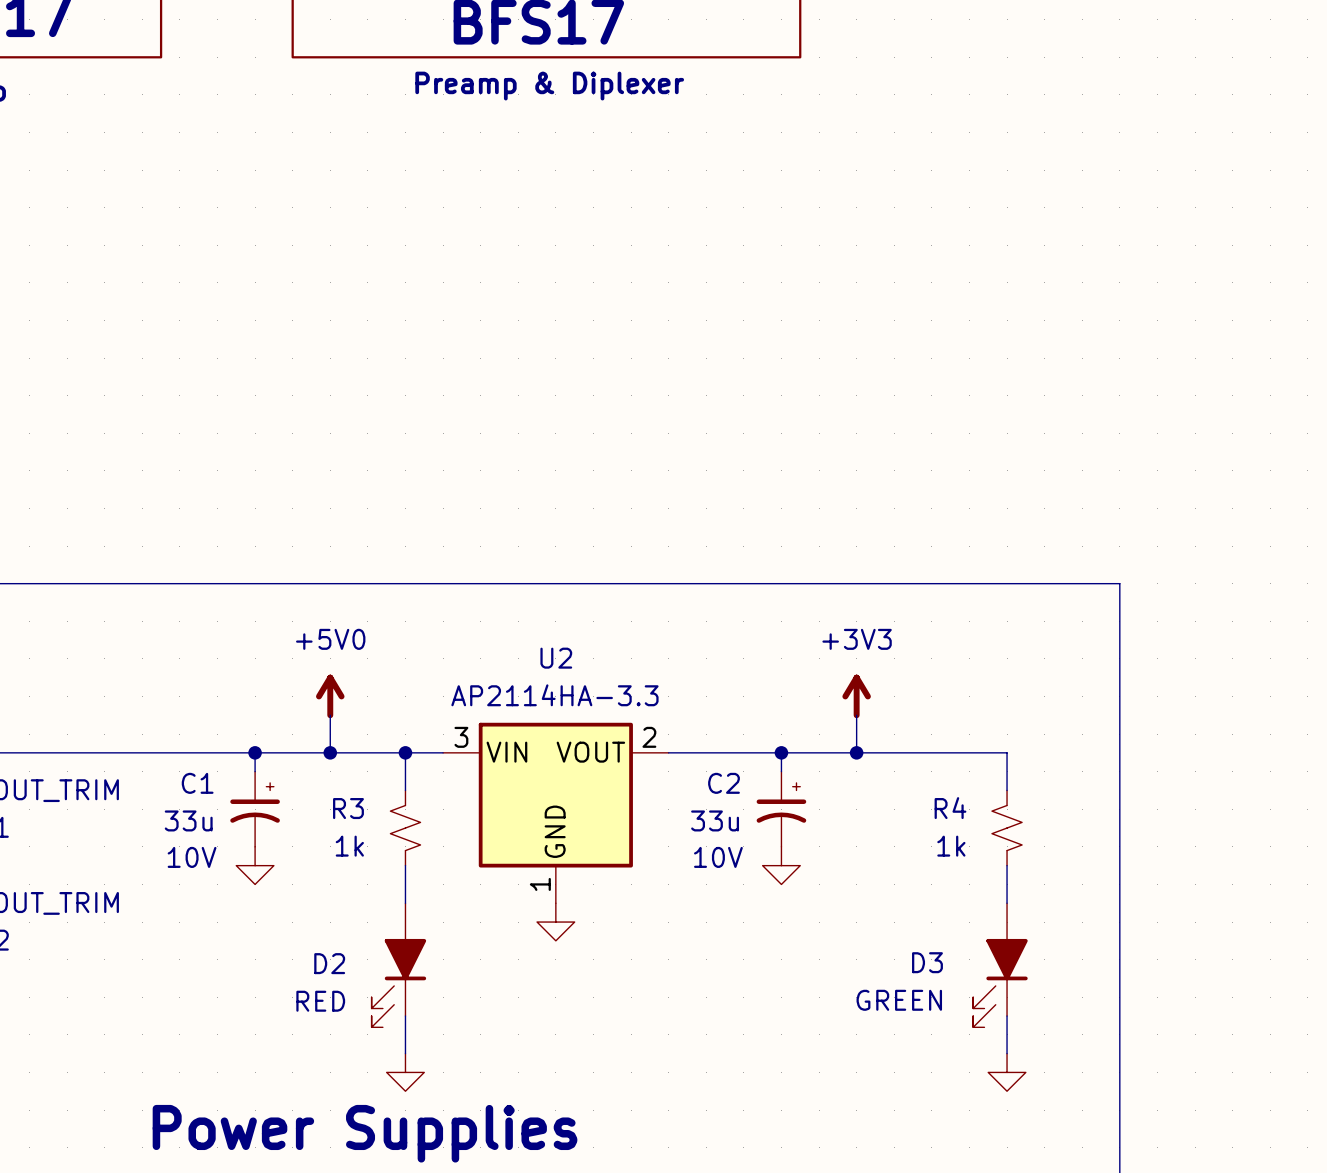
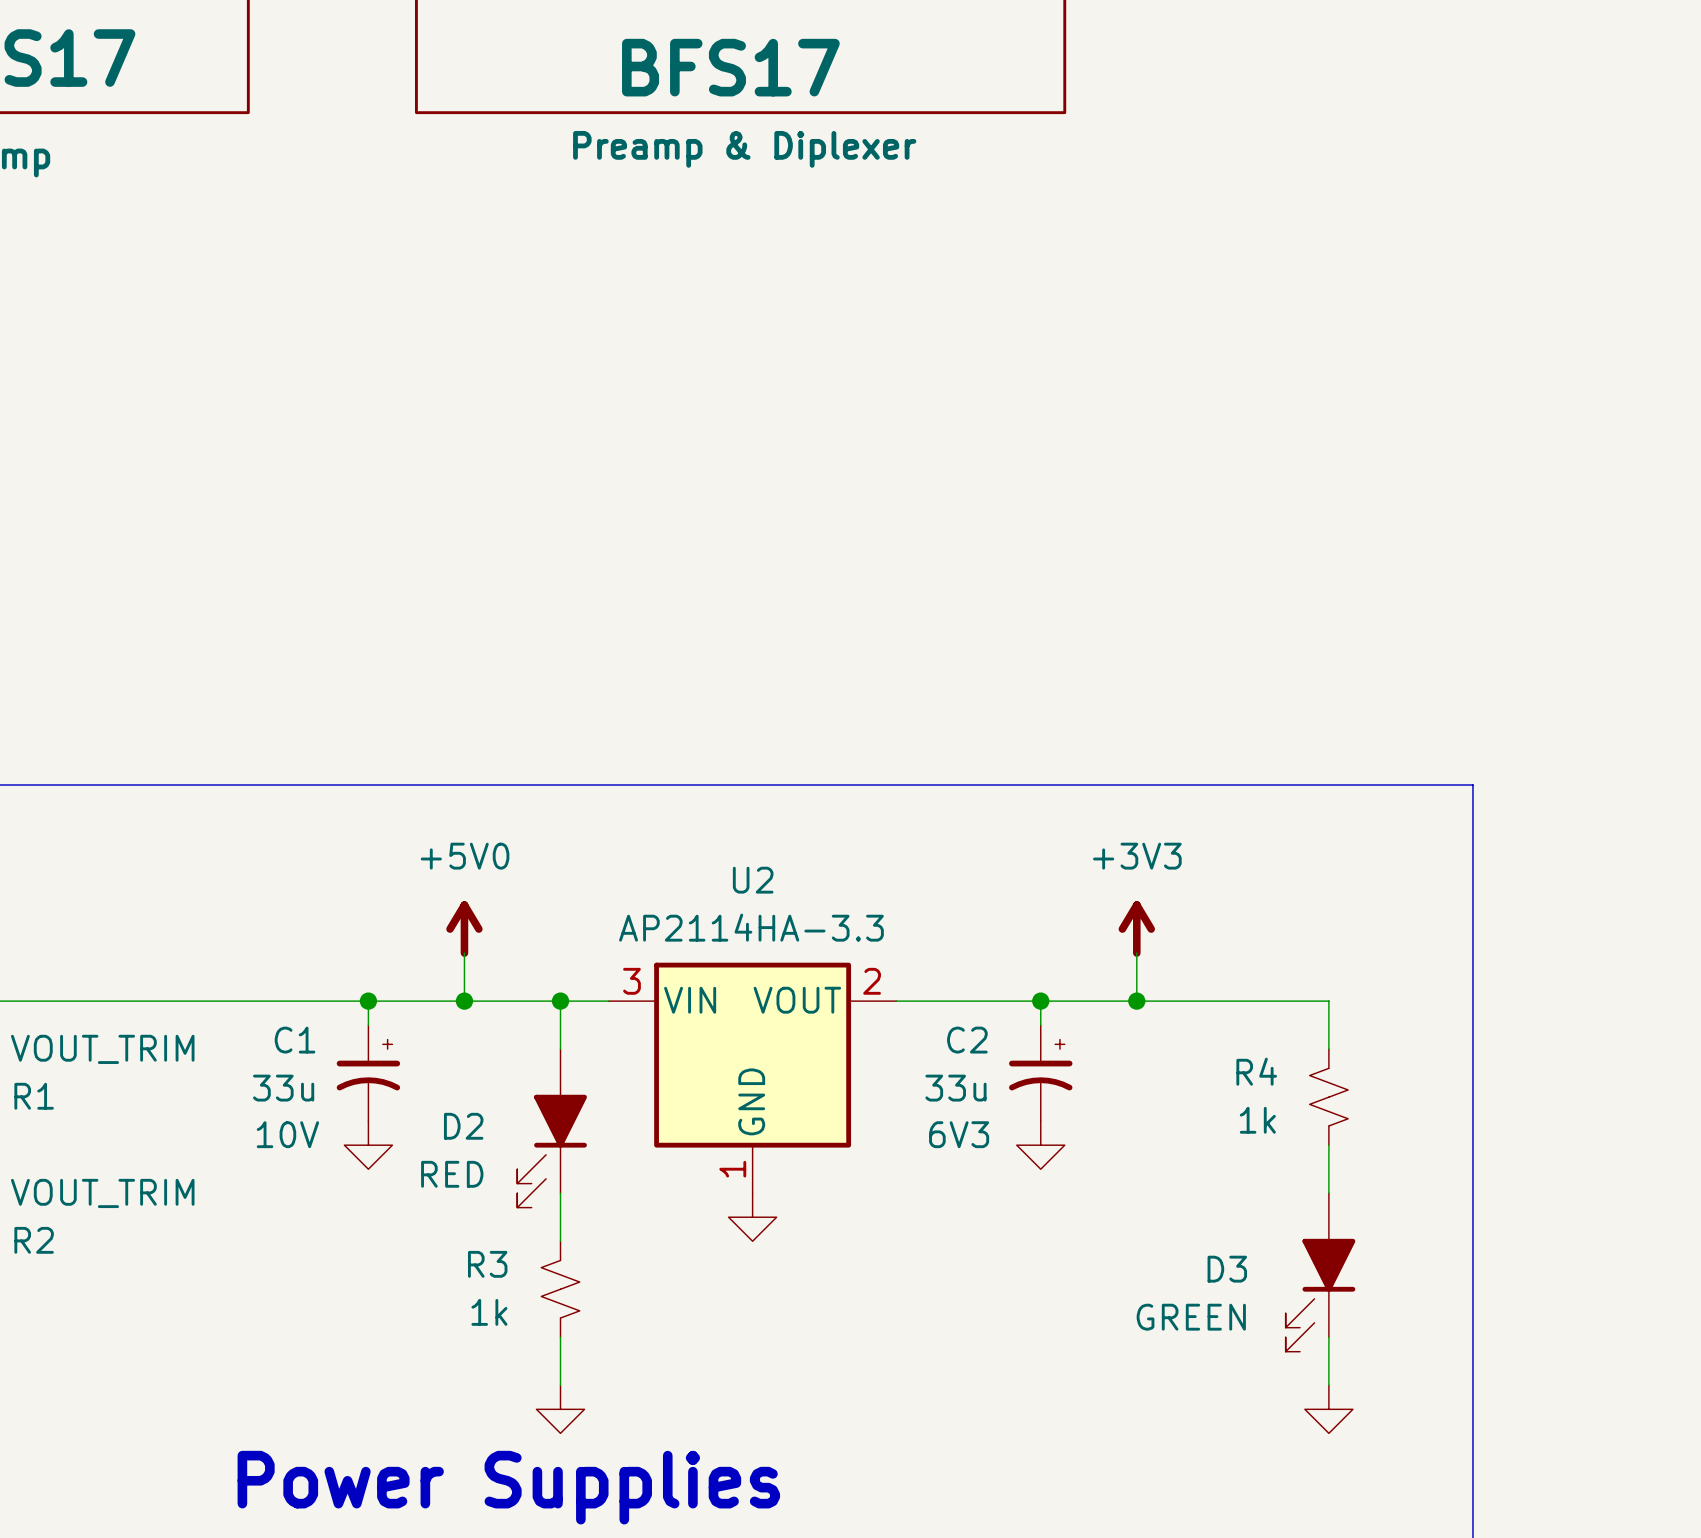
R3 position: (405, 828) -> (560, 1289)
C2 text: 10V (718, 857) -> 6V3 (959, 1134)
D2 position: (398, 965) -> (552, 1128)

